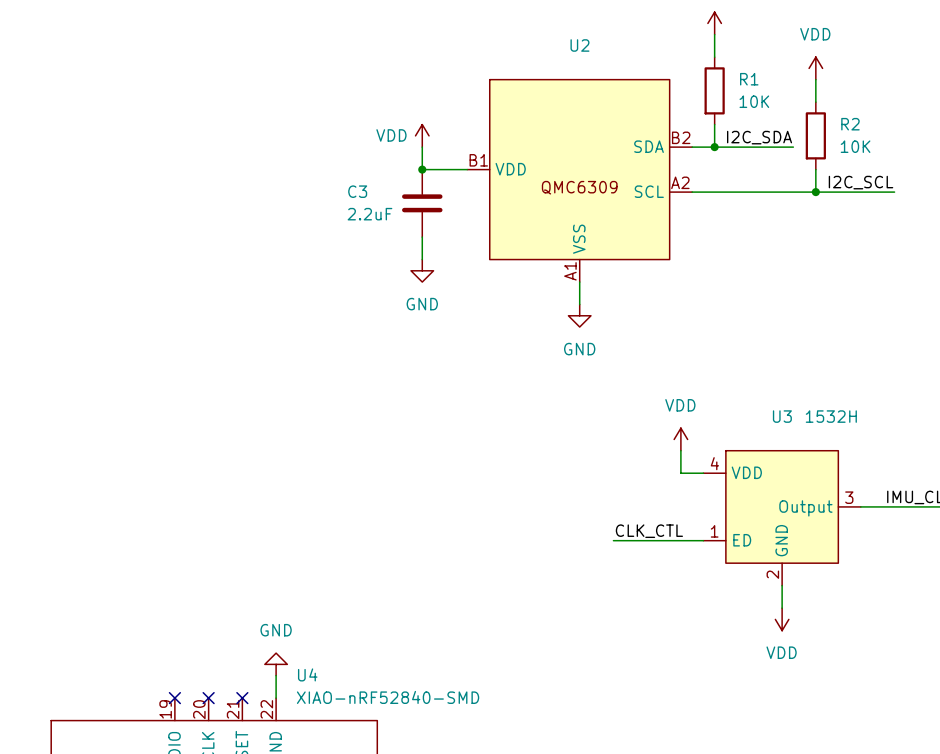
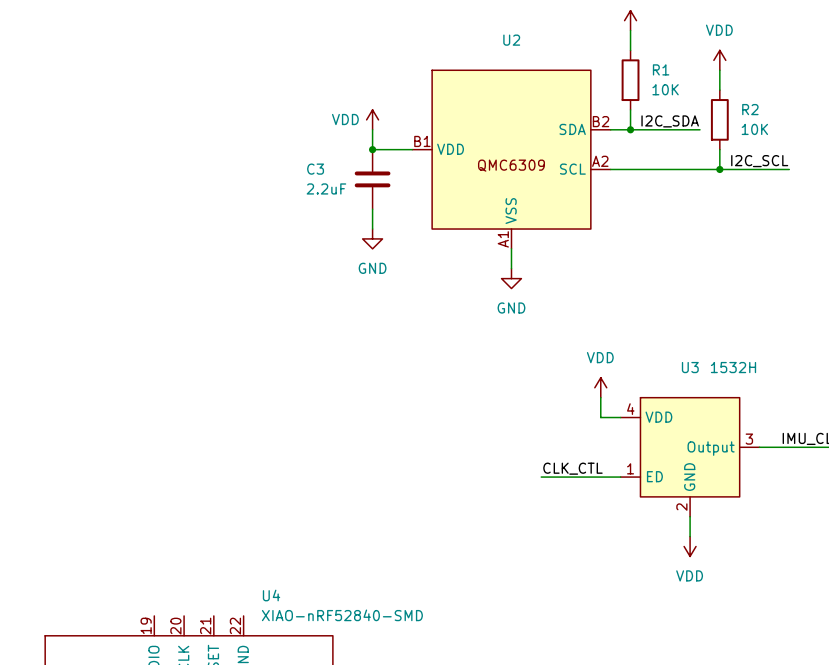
power symbol: GND (276, 664) -> none
wire: (276, 675) (276, 698) -> none
no-connect mark: (174, 698) -> none
no-connect mark: (208, 698) -> none
no-connect mark: (242, 698) -> none

